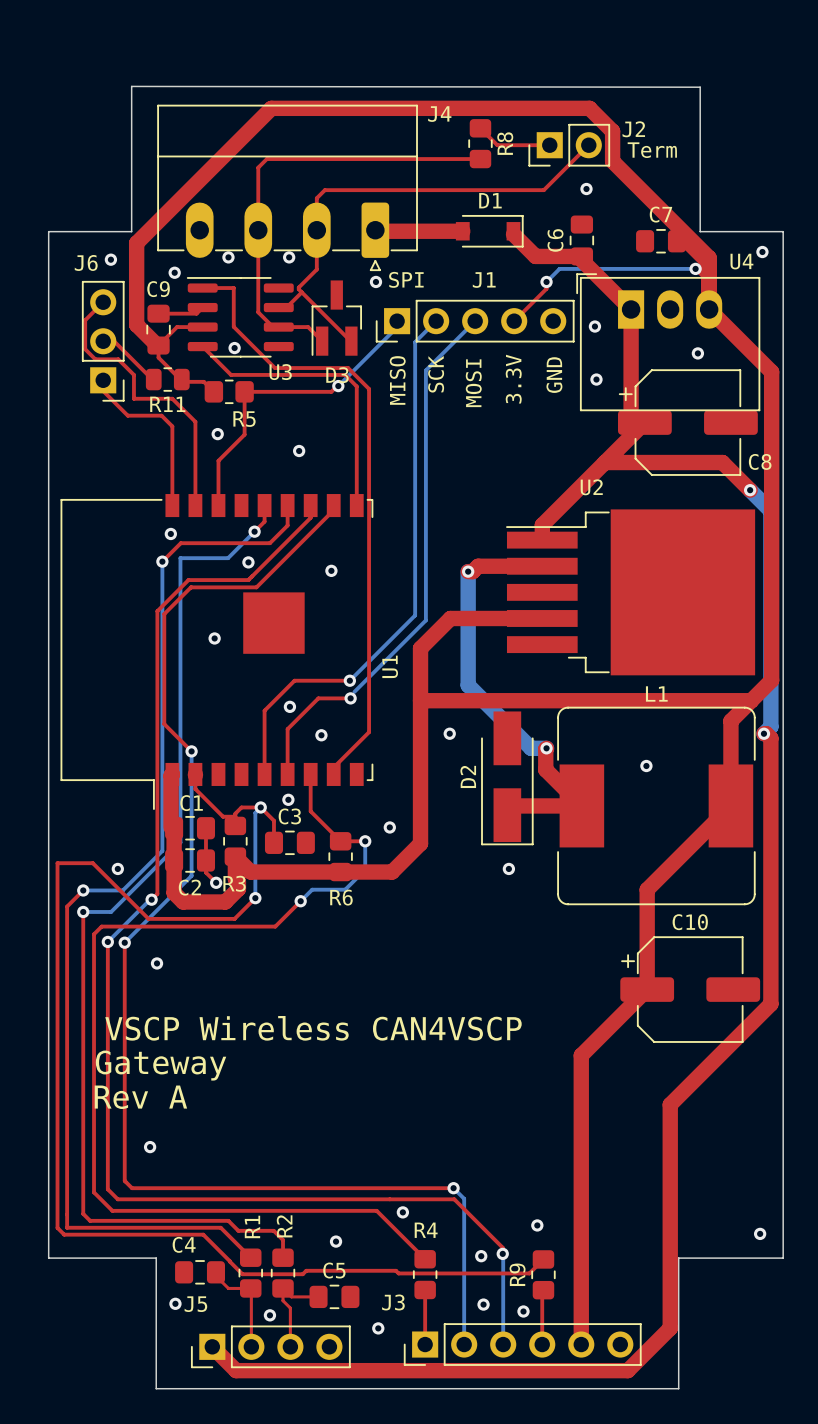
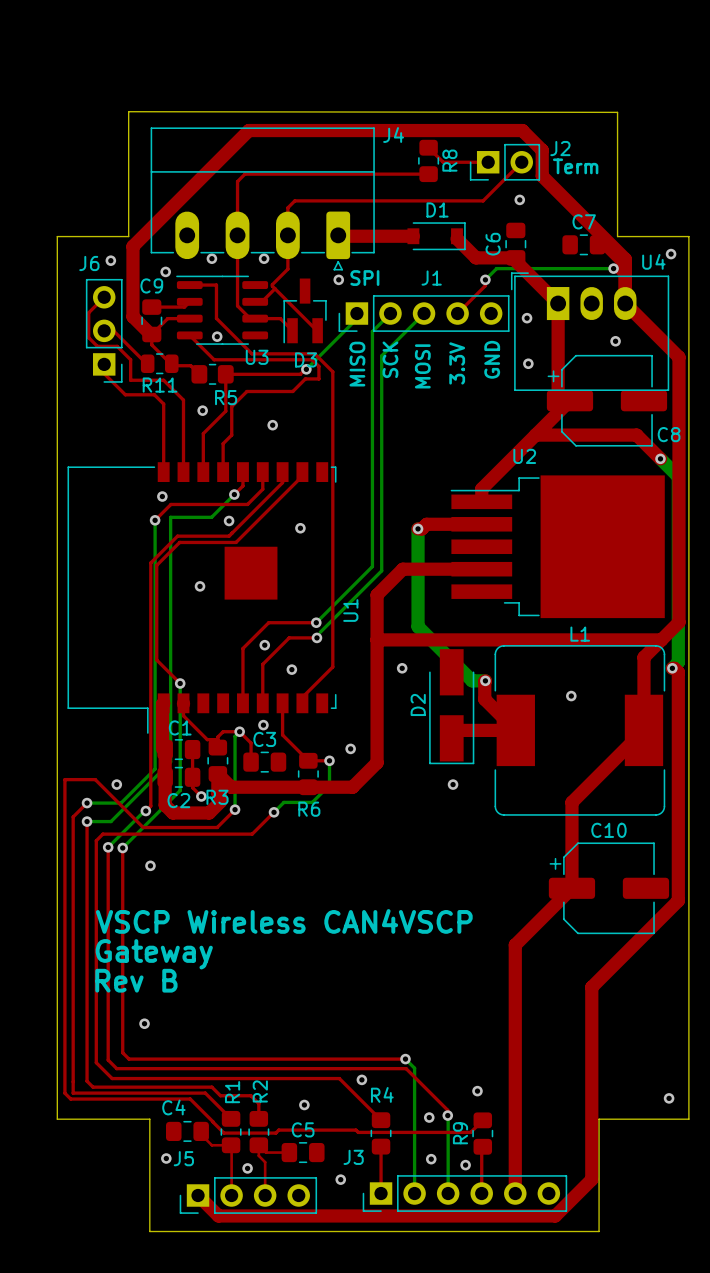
top track: (352, 382) (356, 386) (356, 505) -> (318, 366) (318, 378) (305, 378) (292, 391) (246, 391) (231, 406) (231, 435) (223, 443) (223, 472)
text: Rev A (140, 1097) -> Rev B (136, 980)

